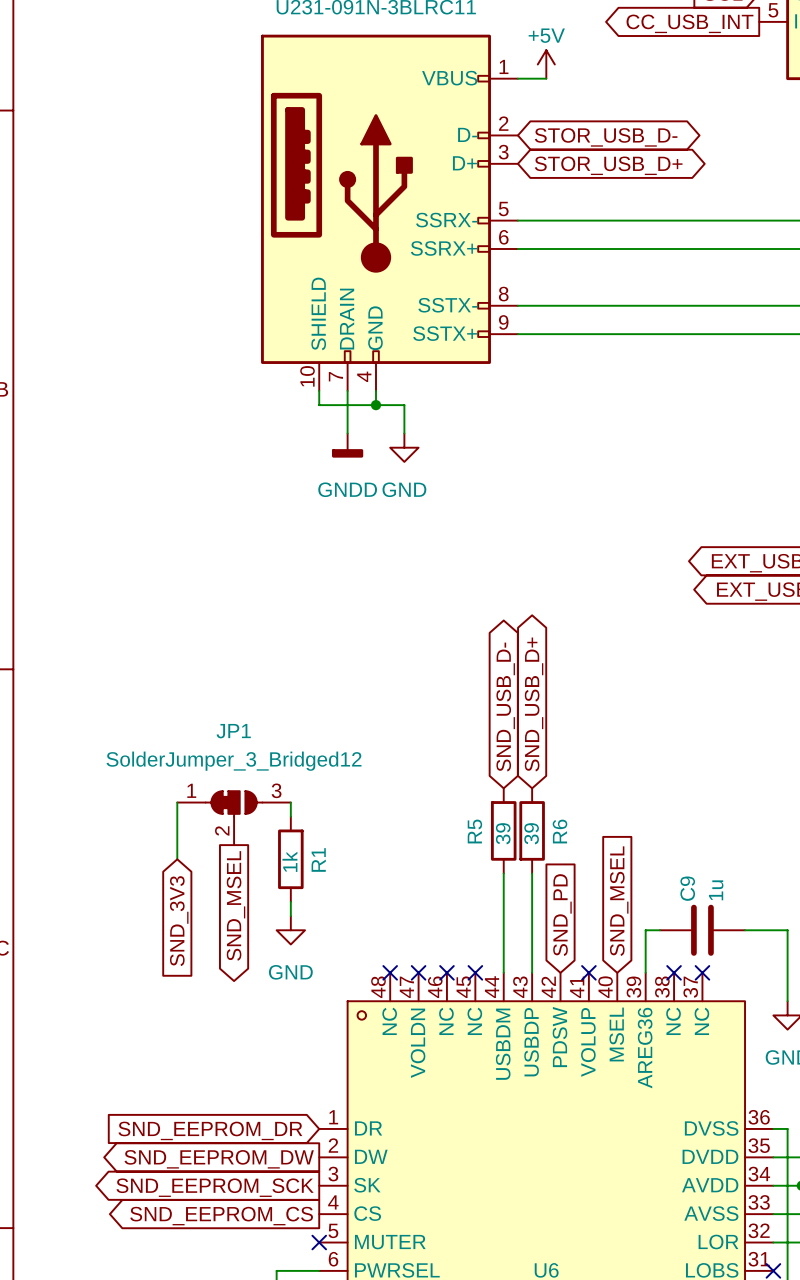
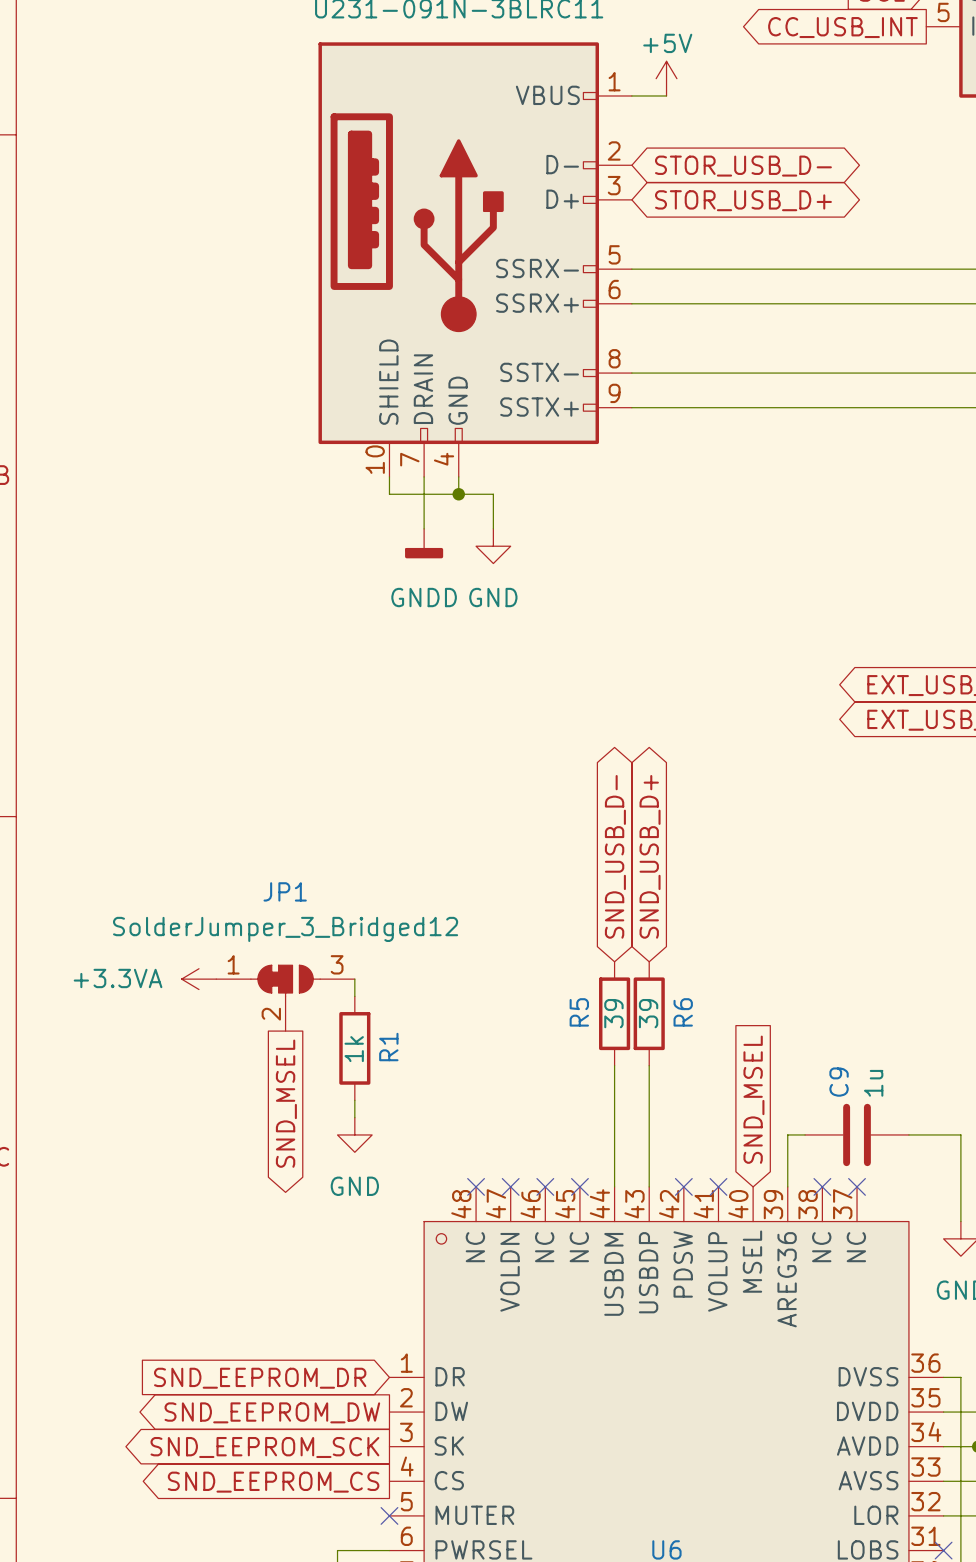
power symbol: none -> +3.3VA (198, 979)
wire: (177, 802) (177, 859) -> none
global label: SND_PD (562, 915) -> none
global label: SND_3V3 (179, 921) -> none
no-connect mark: none -> (683, 1186)

